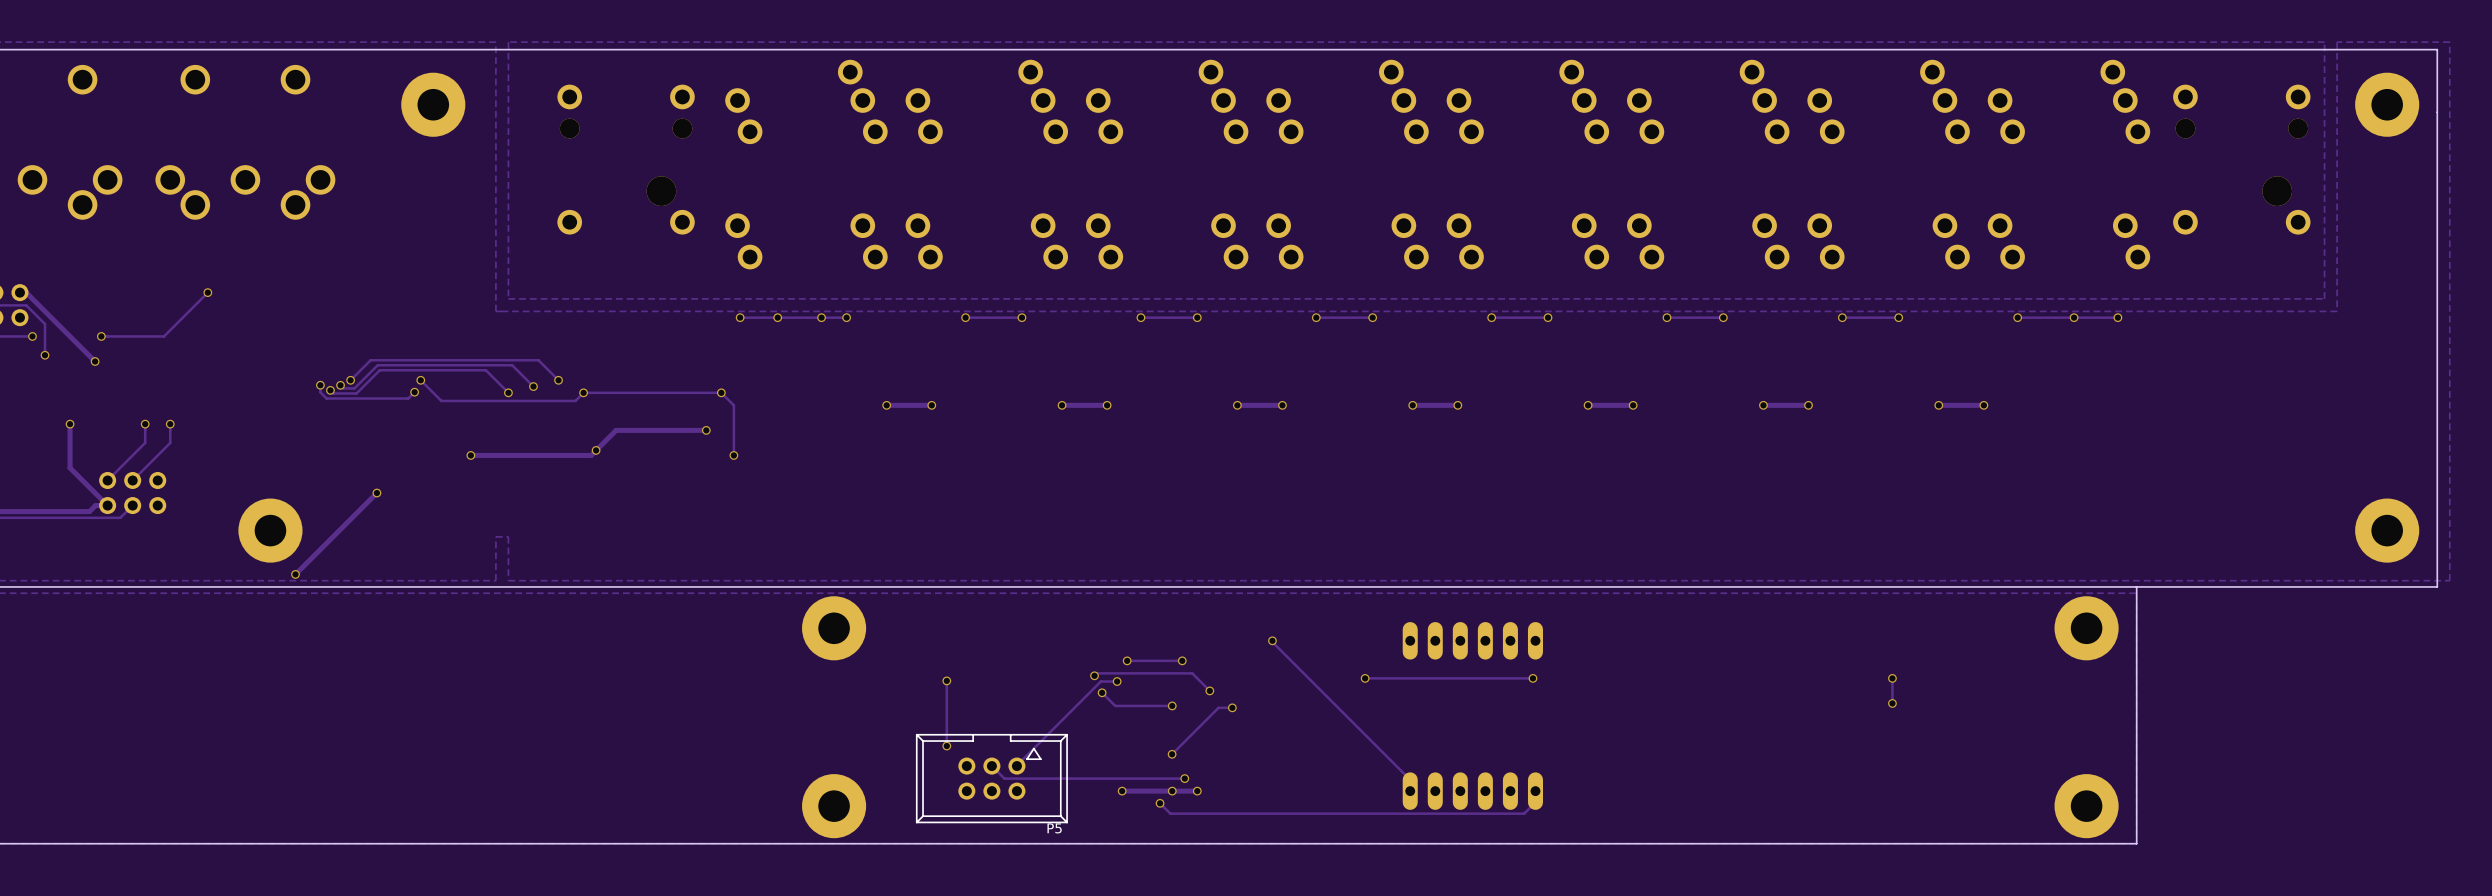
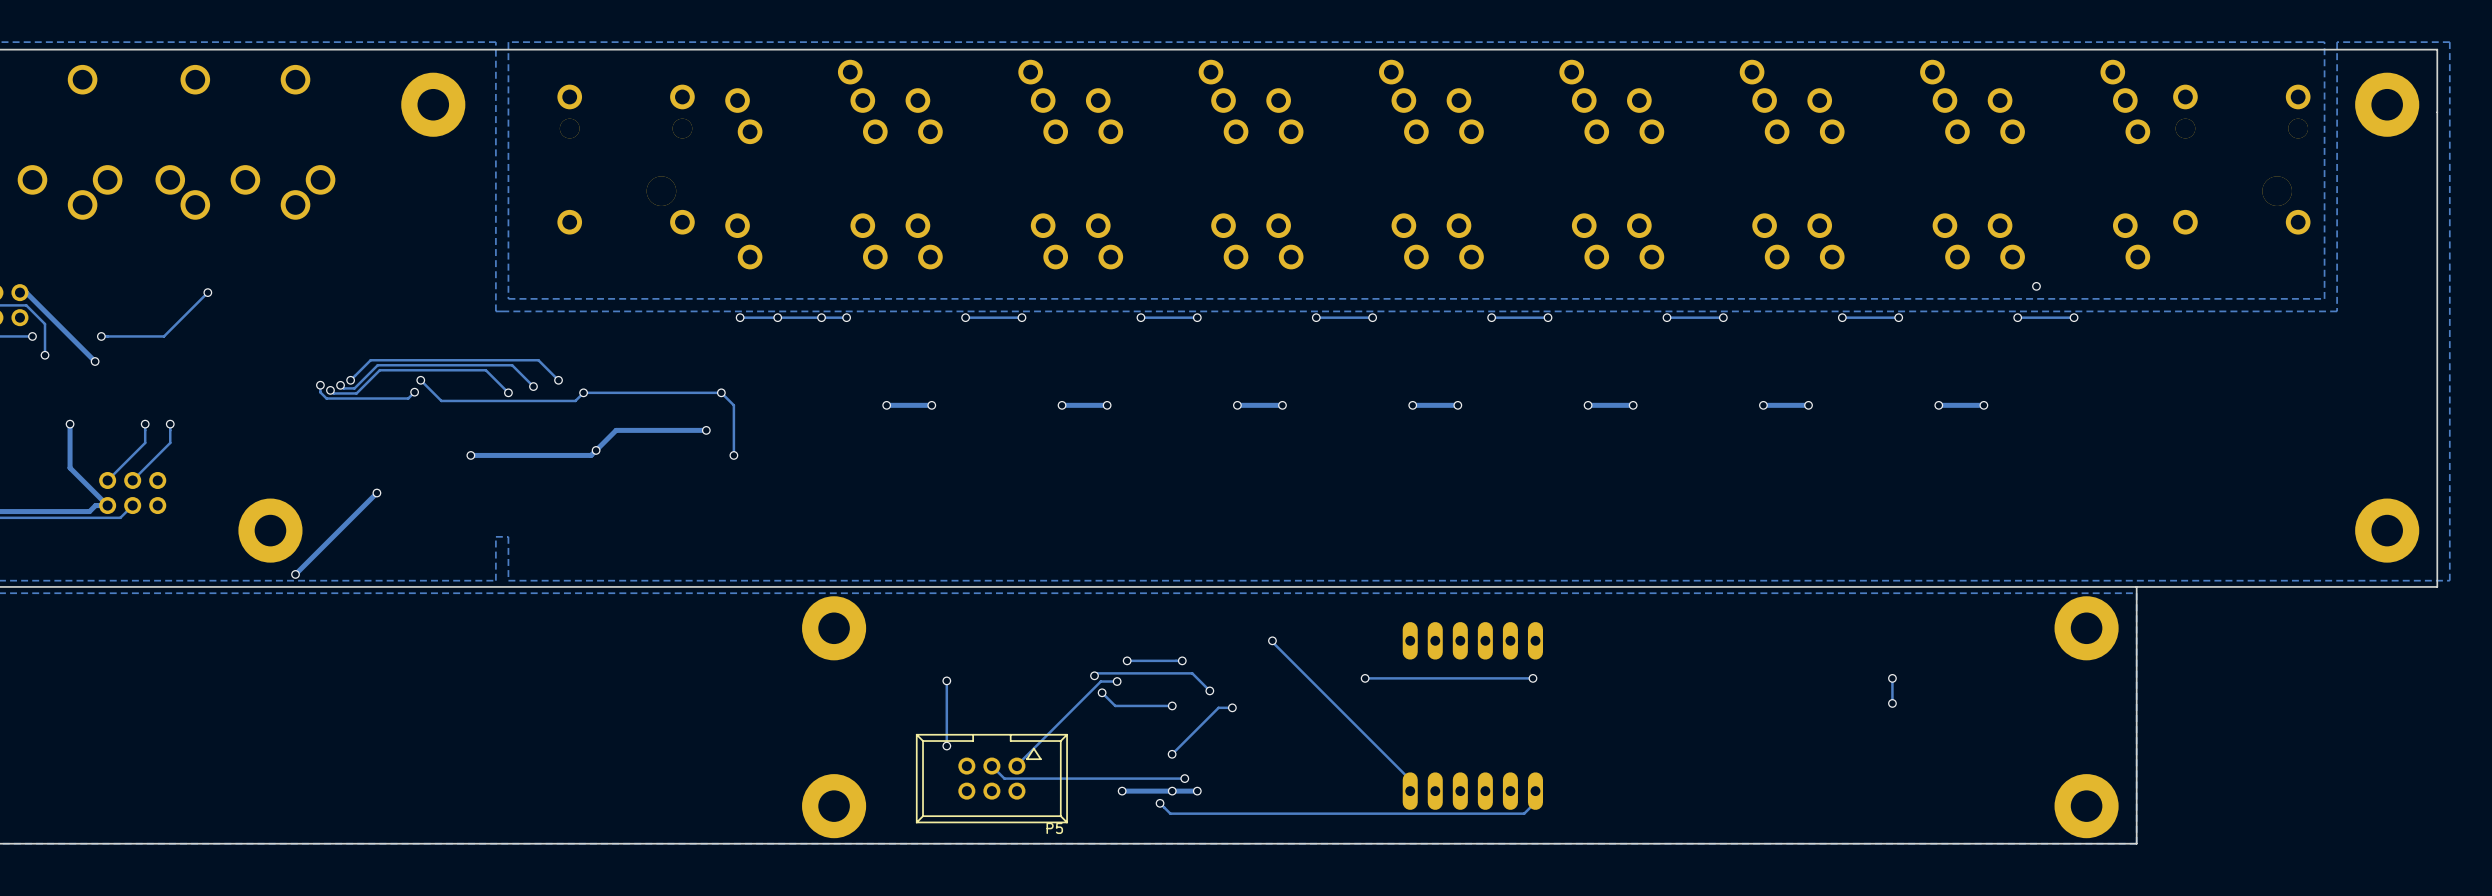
via: none -> (2036, 286)
track: (2117, 317) (2074, 317) -> none
via: (2117, 317) -> none

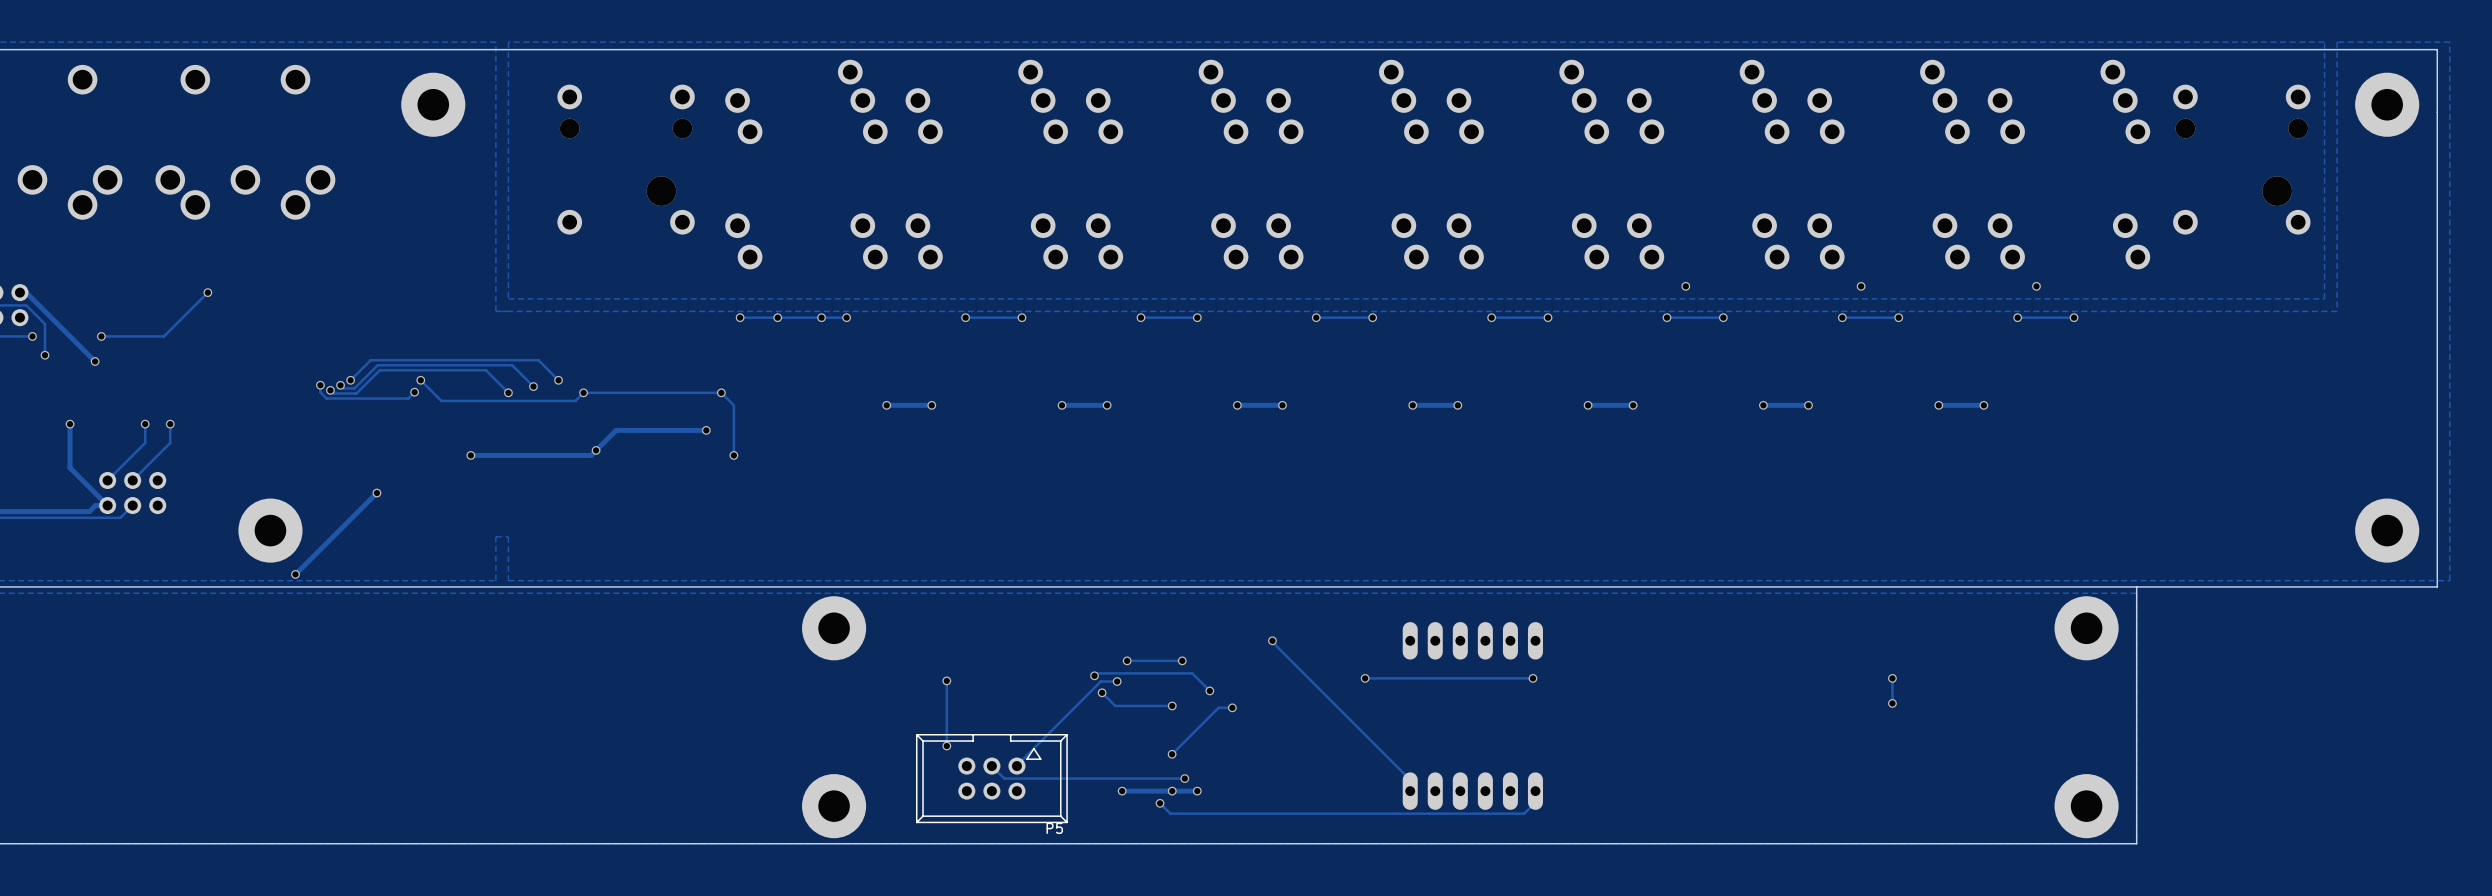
via: none -> (1685, 286)
via: none -> (1861, 286)

